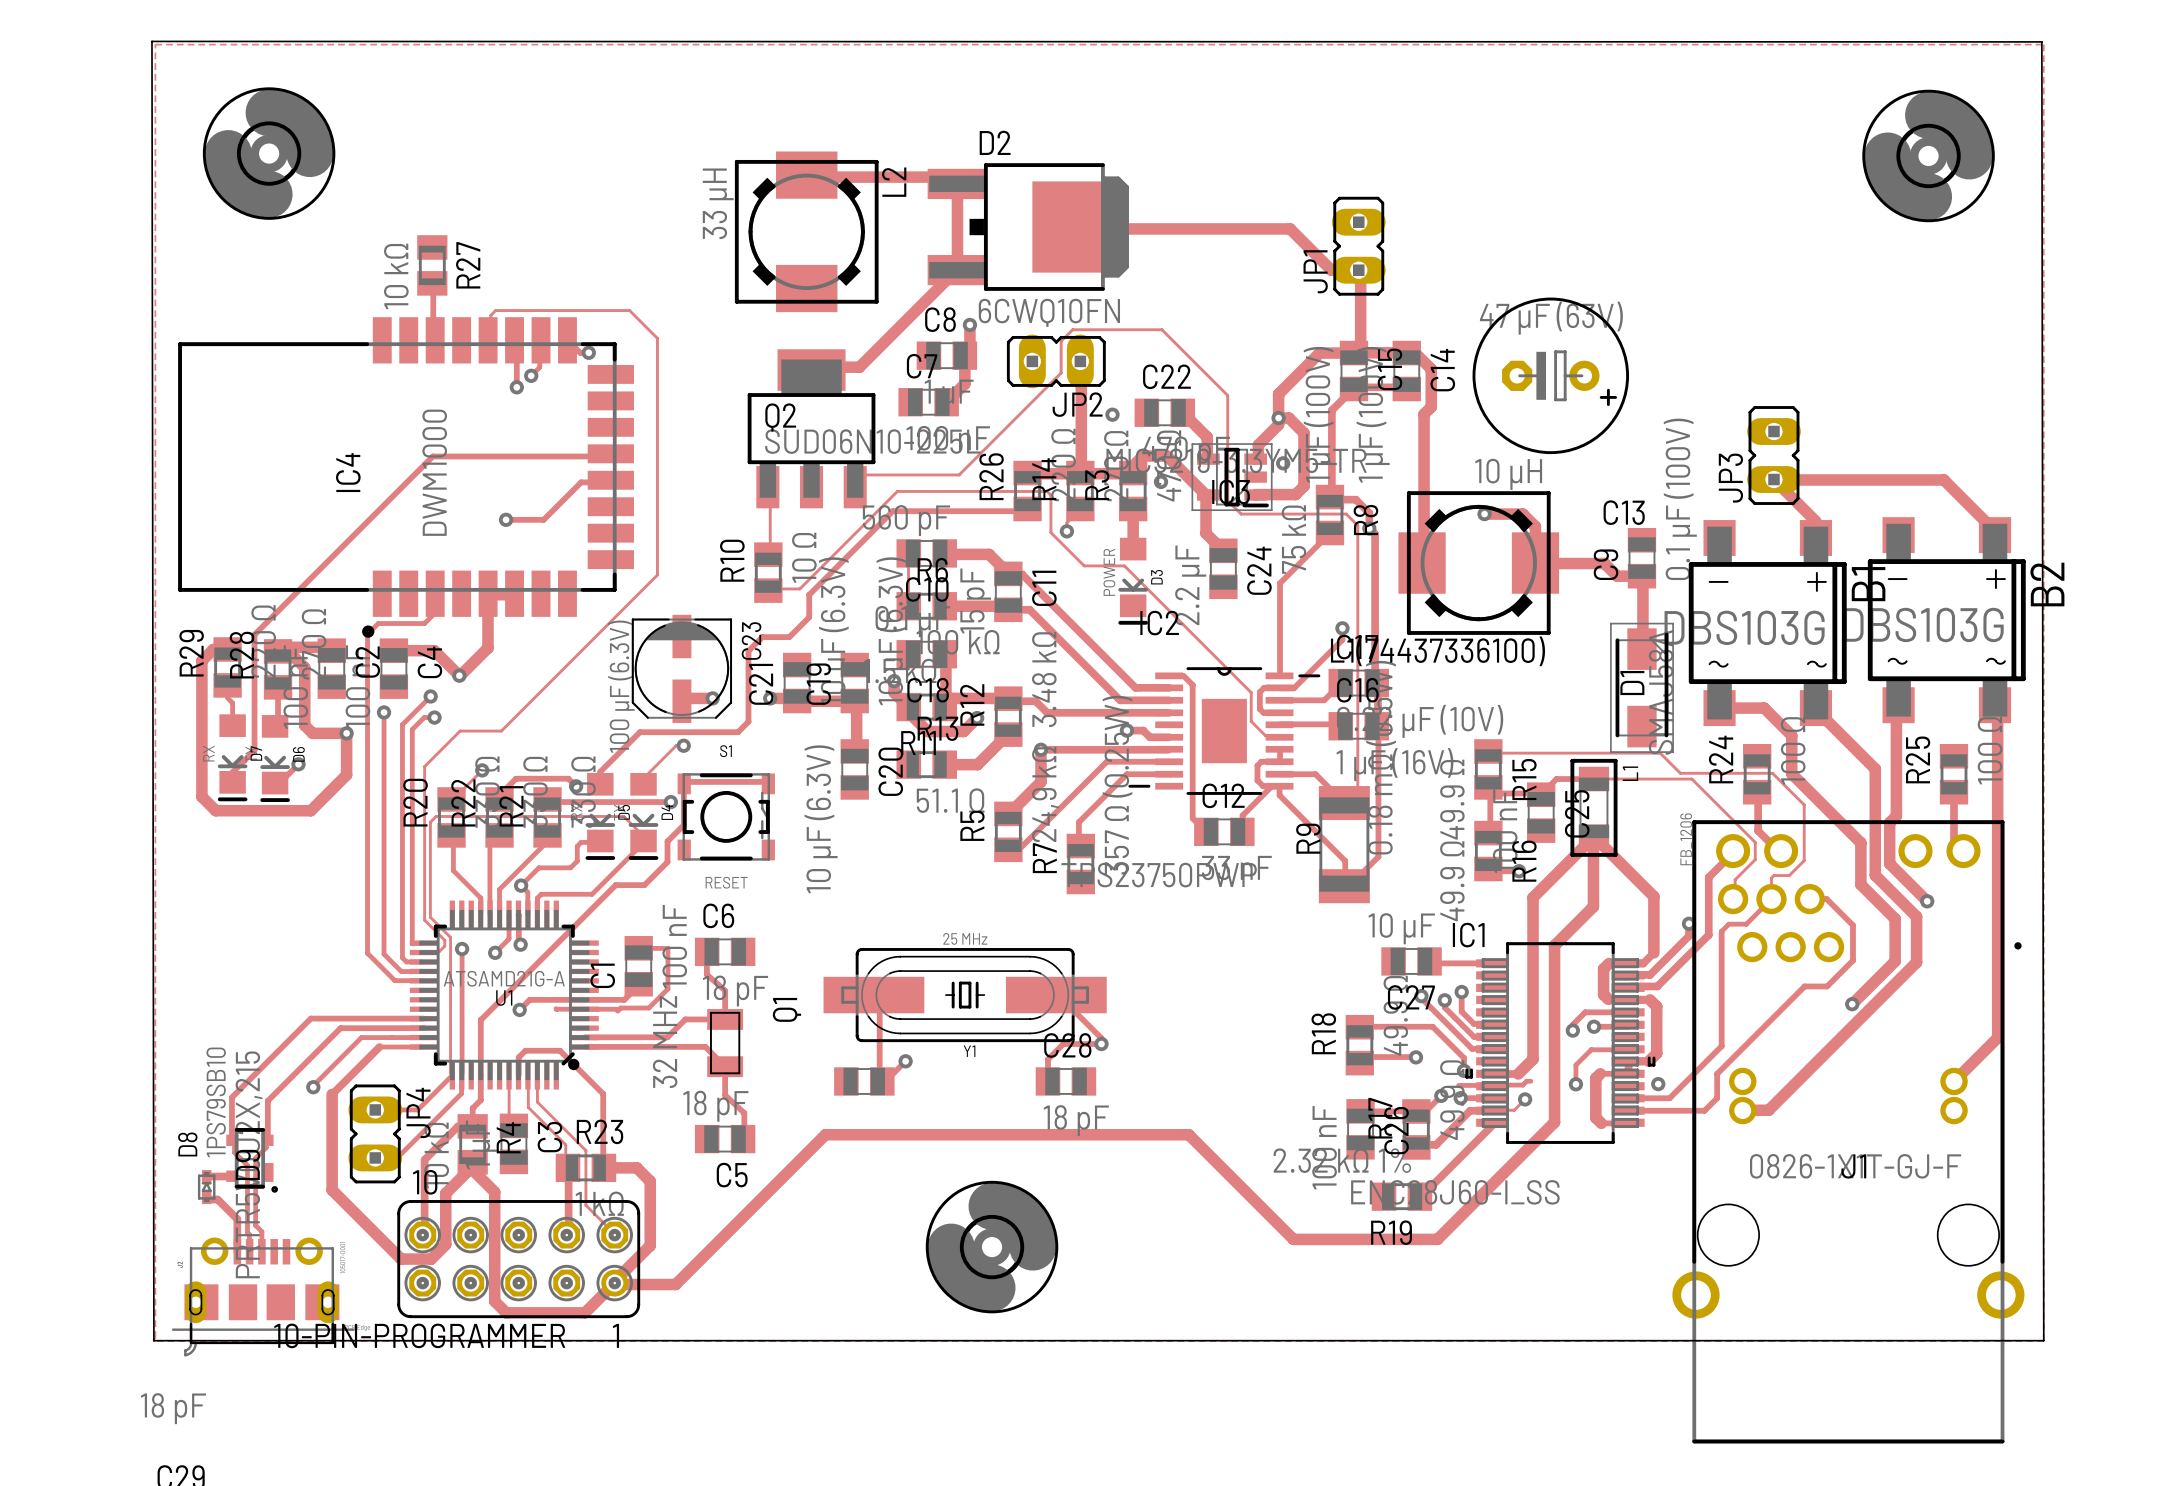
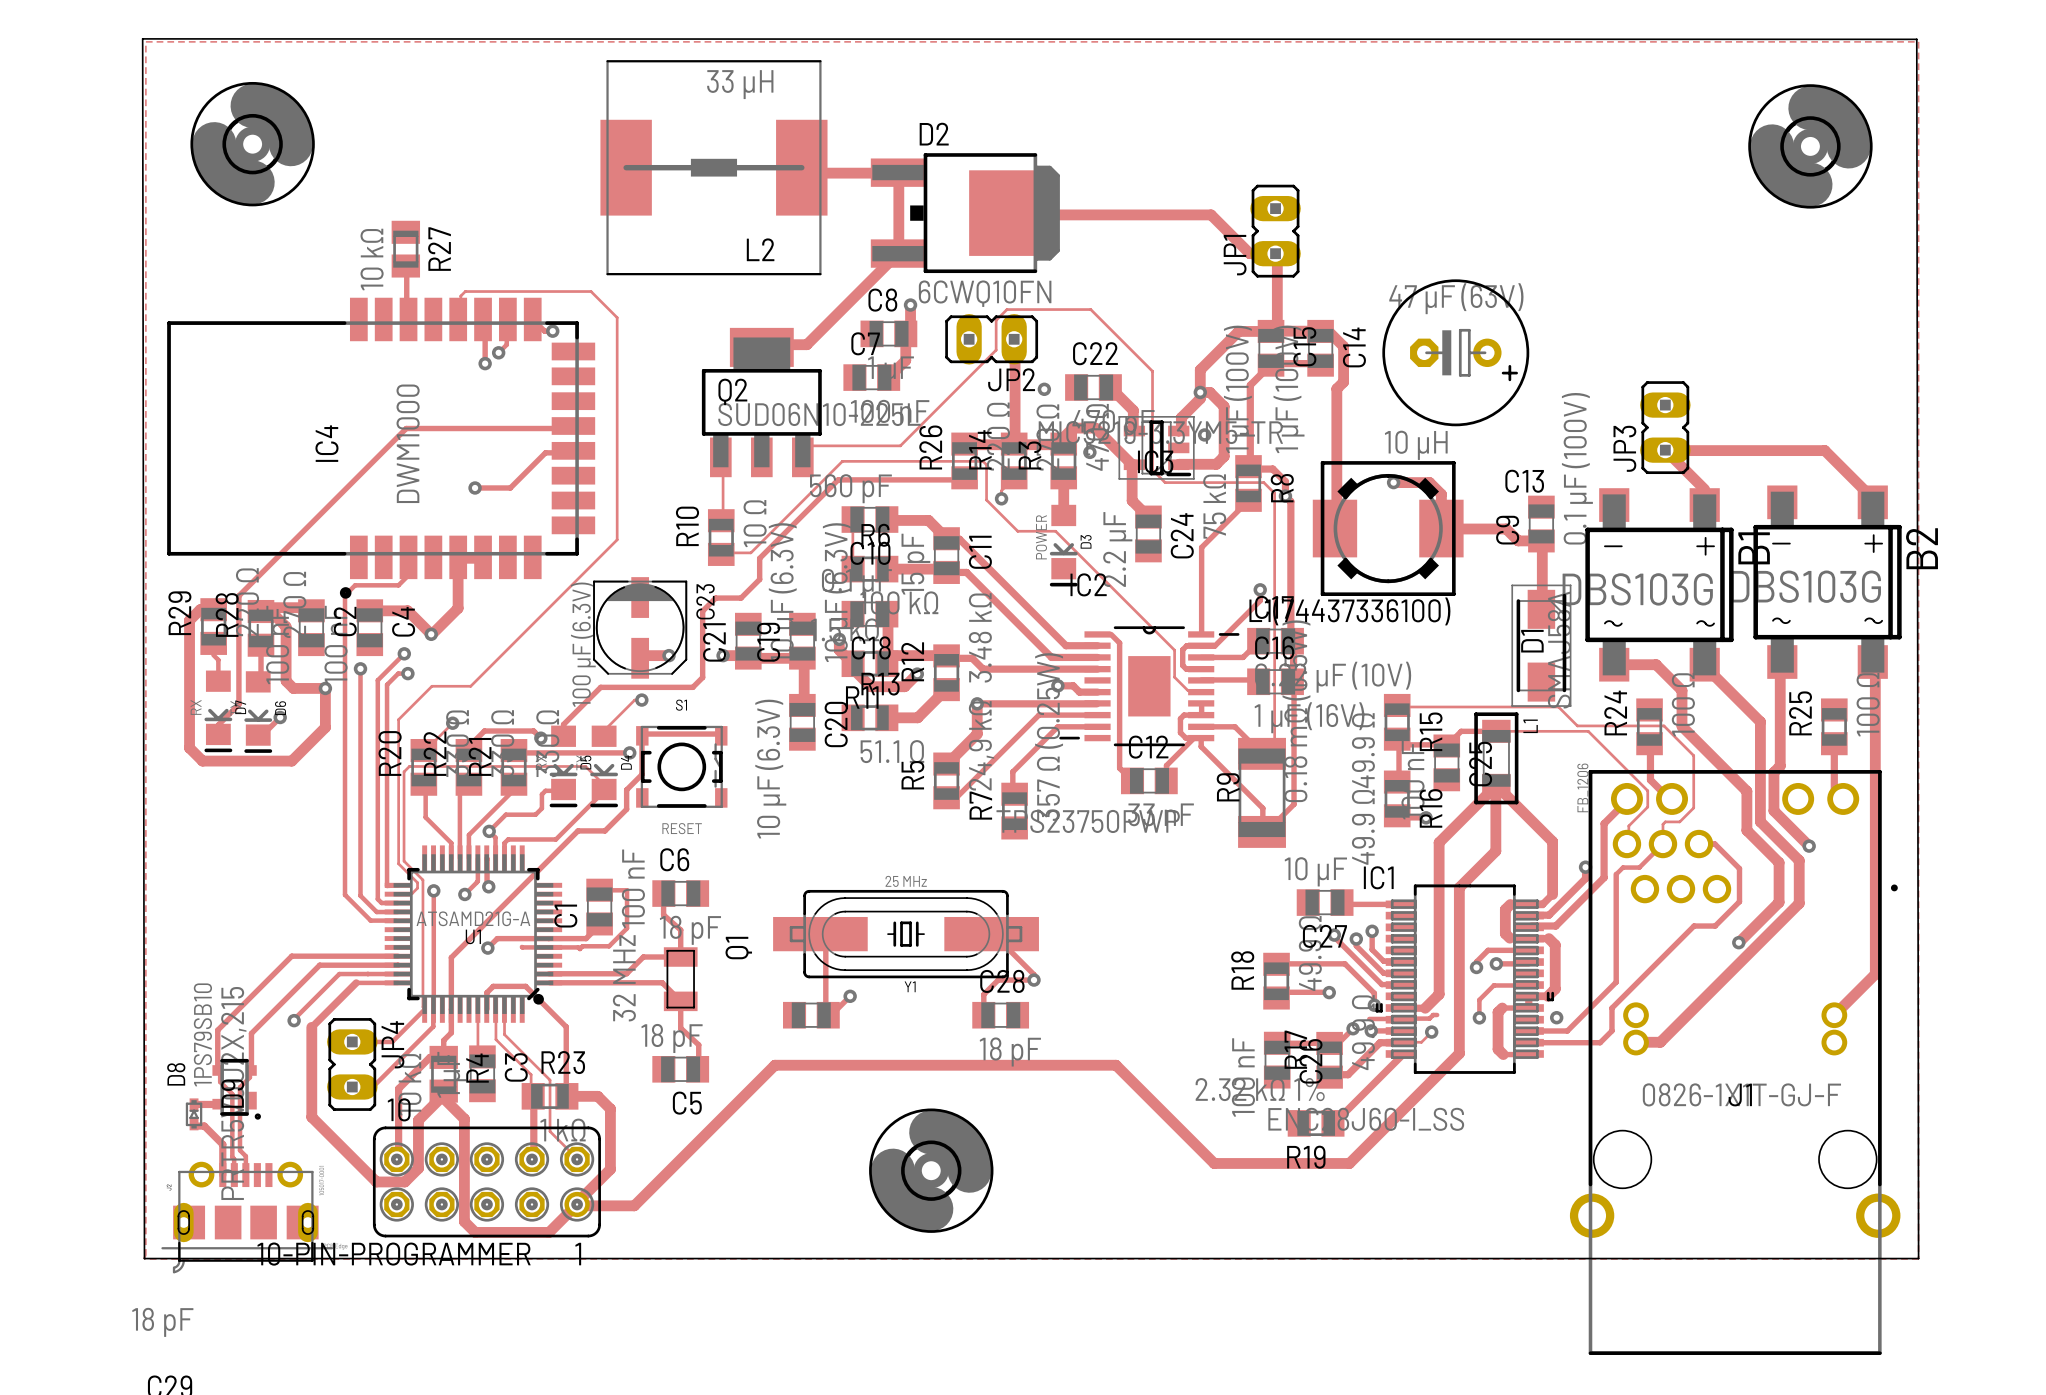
L2 footprint: [734, 151, 879, 313] -> [600, 60, 828, 276]
track: (806, 175) (807, 177) (948, 177) (956, 183) -> (801, 167) (807, 173) (895, 174) (897, 172)
L2 name position: L2 (894, 182) -> L2 (760, 249)
L2 value position: 33 µH (718, 203) -> 33 µH (740, 84)

